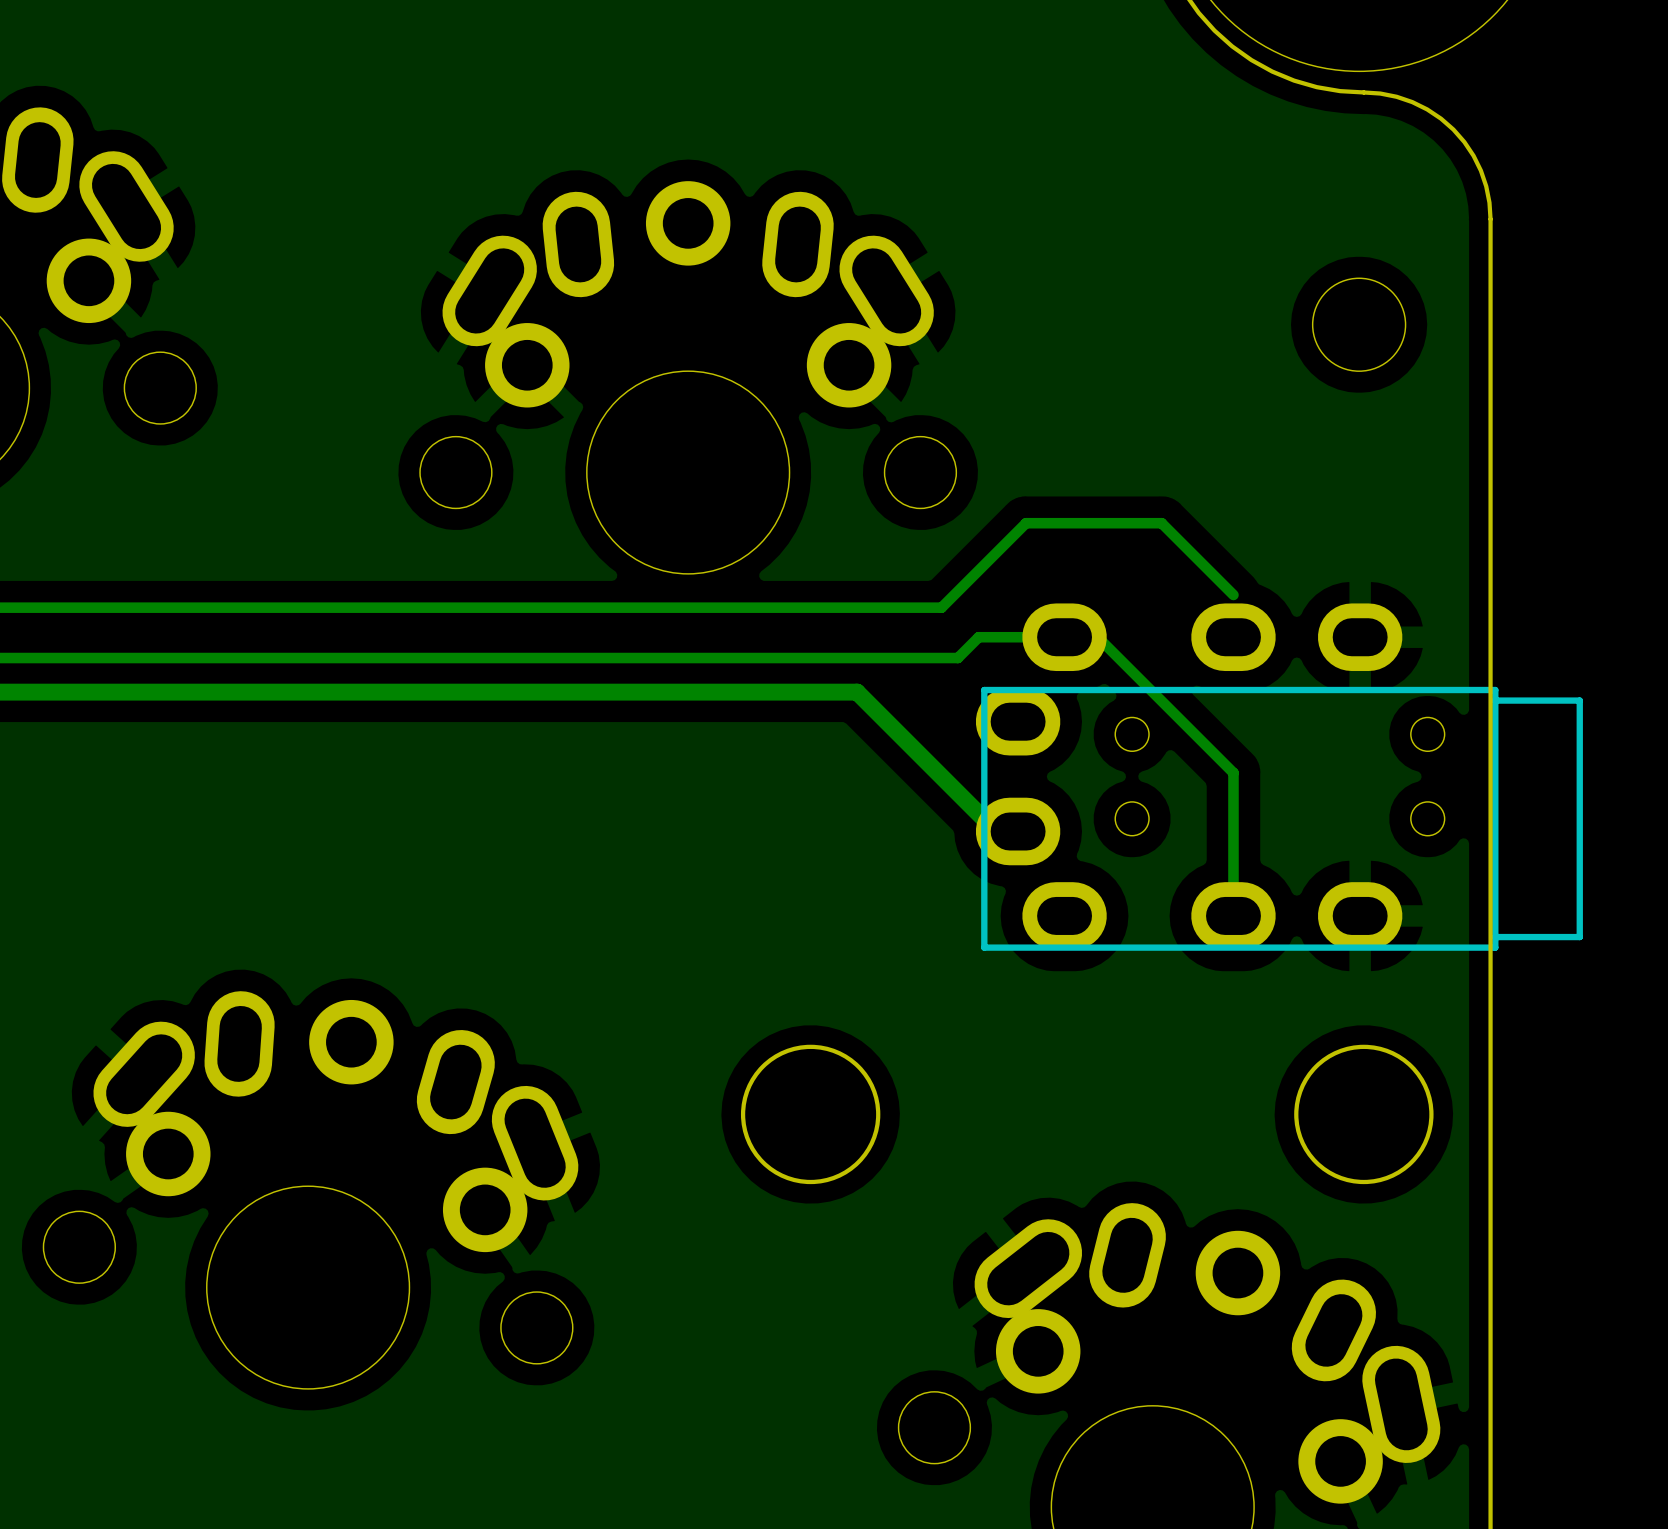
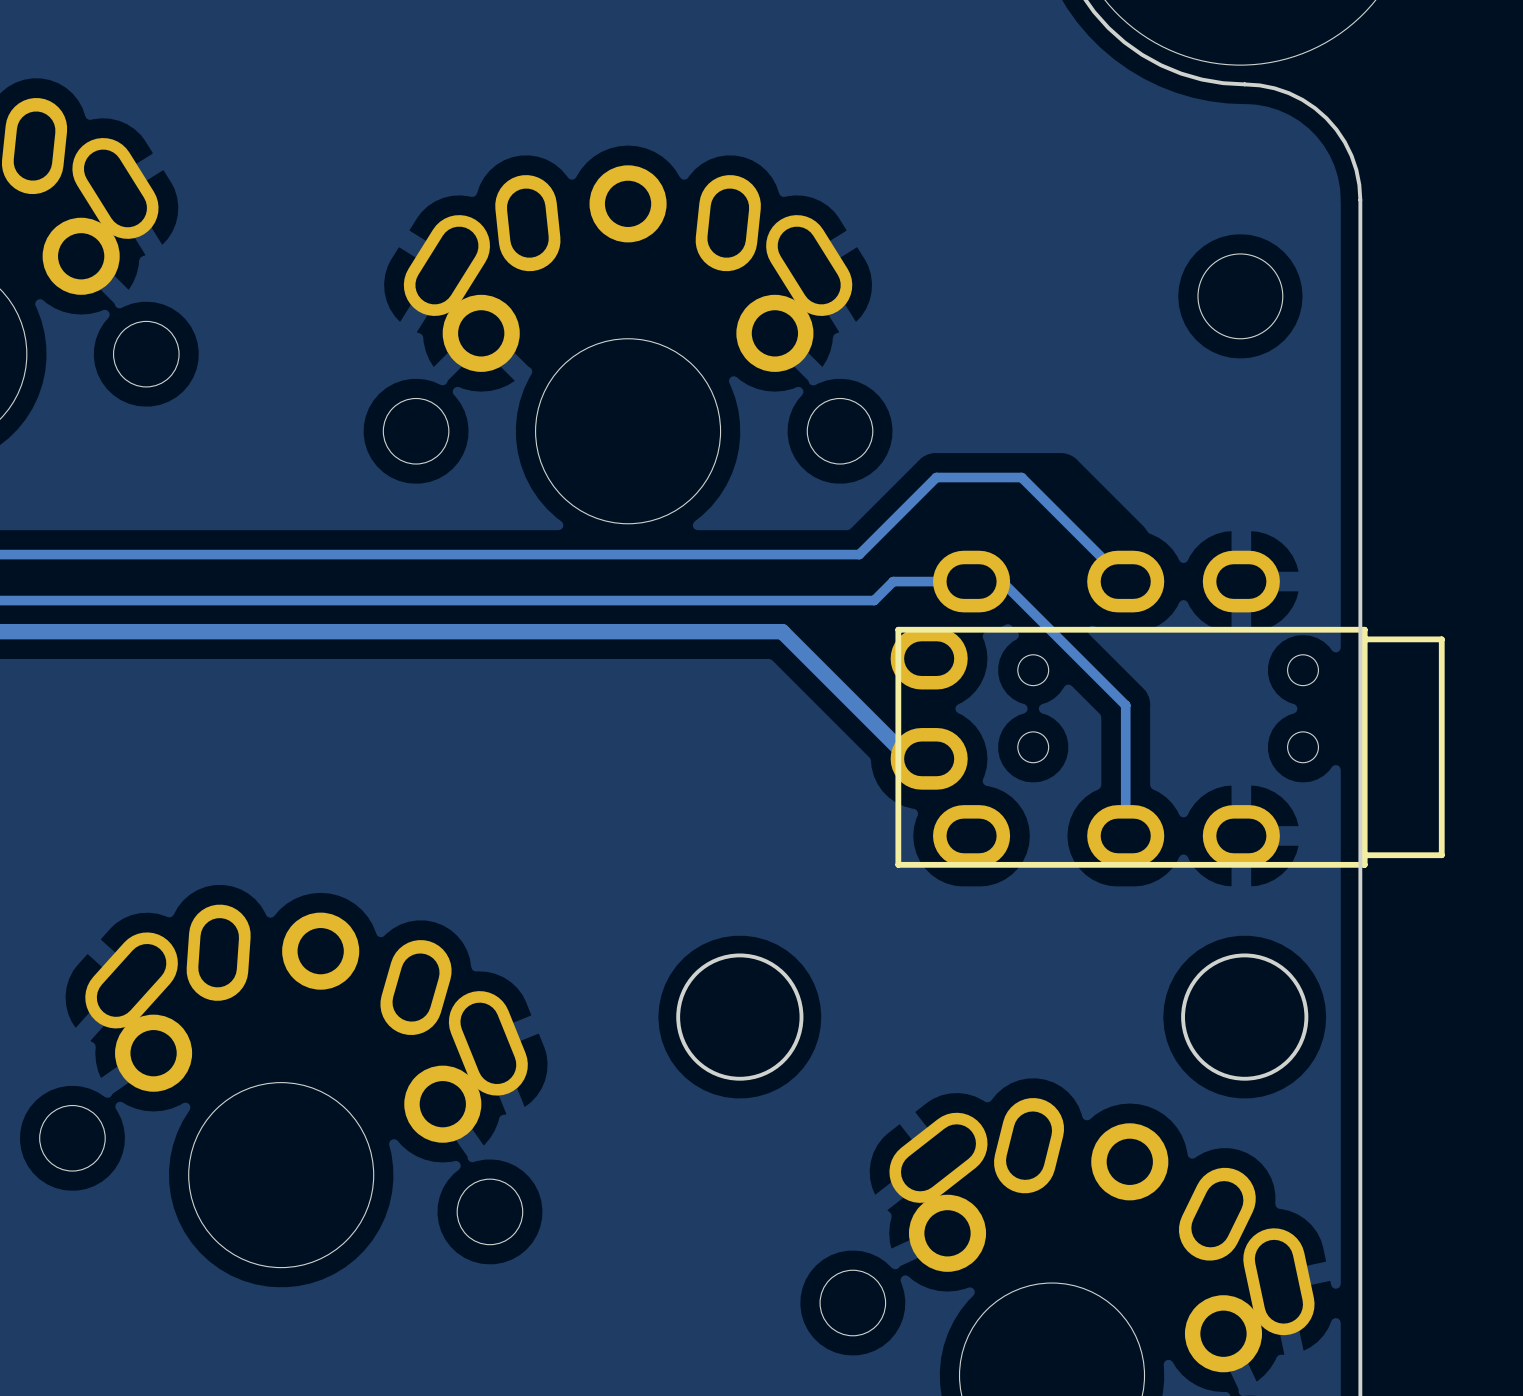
track: (1119, 523) (1161, 523) (1233, 595) -> (1021, 477) (1125, 581)

